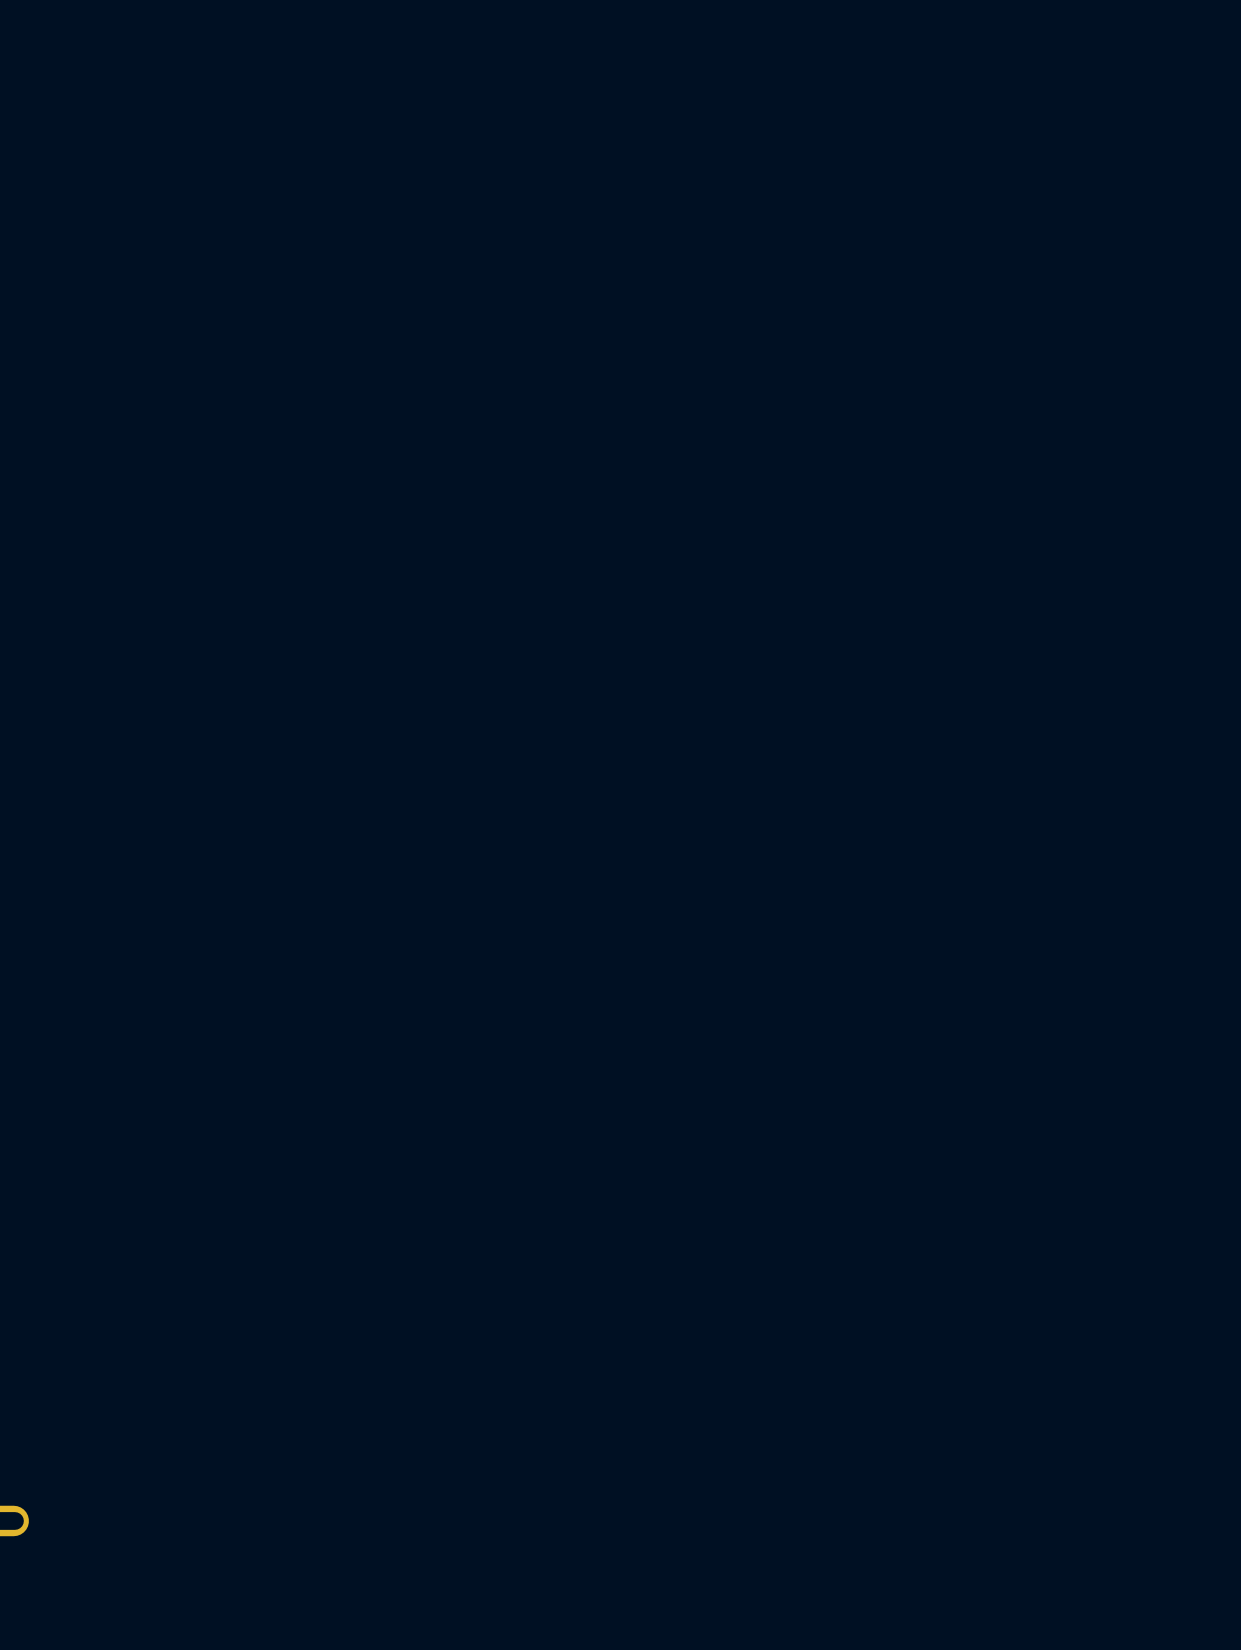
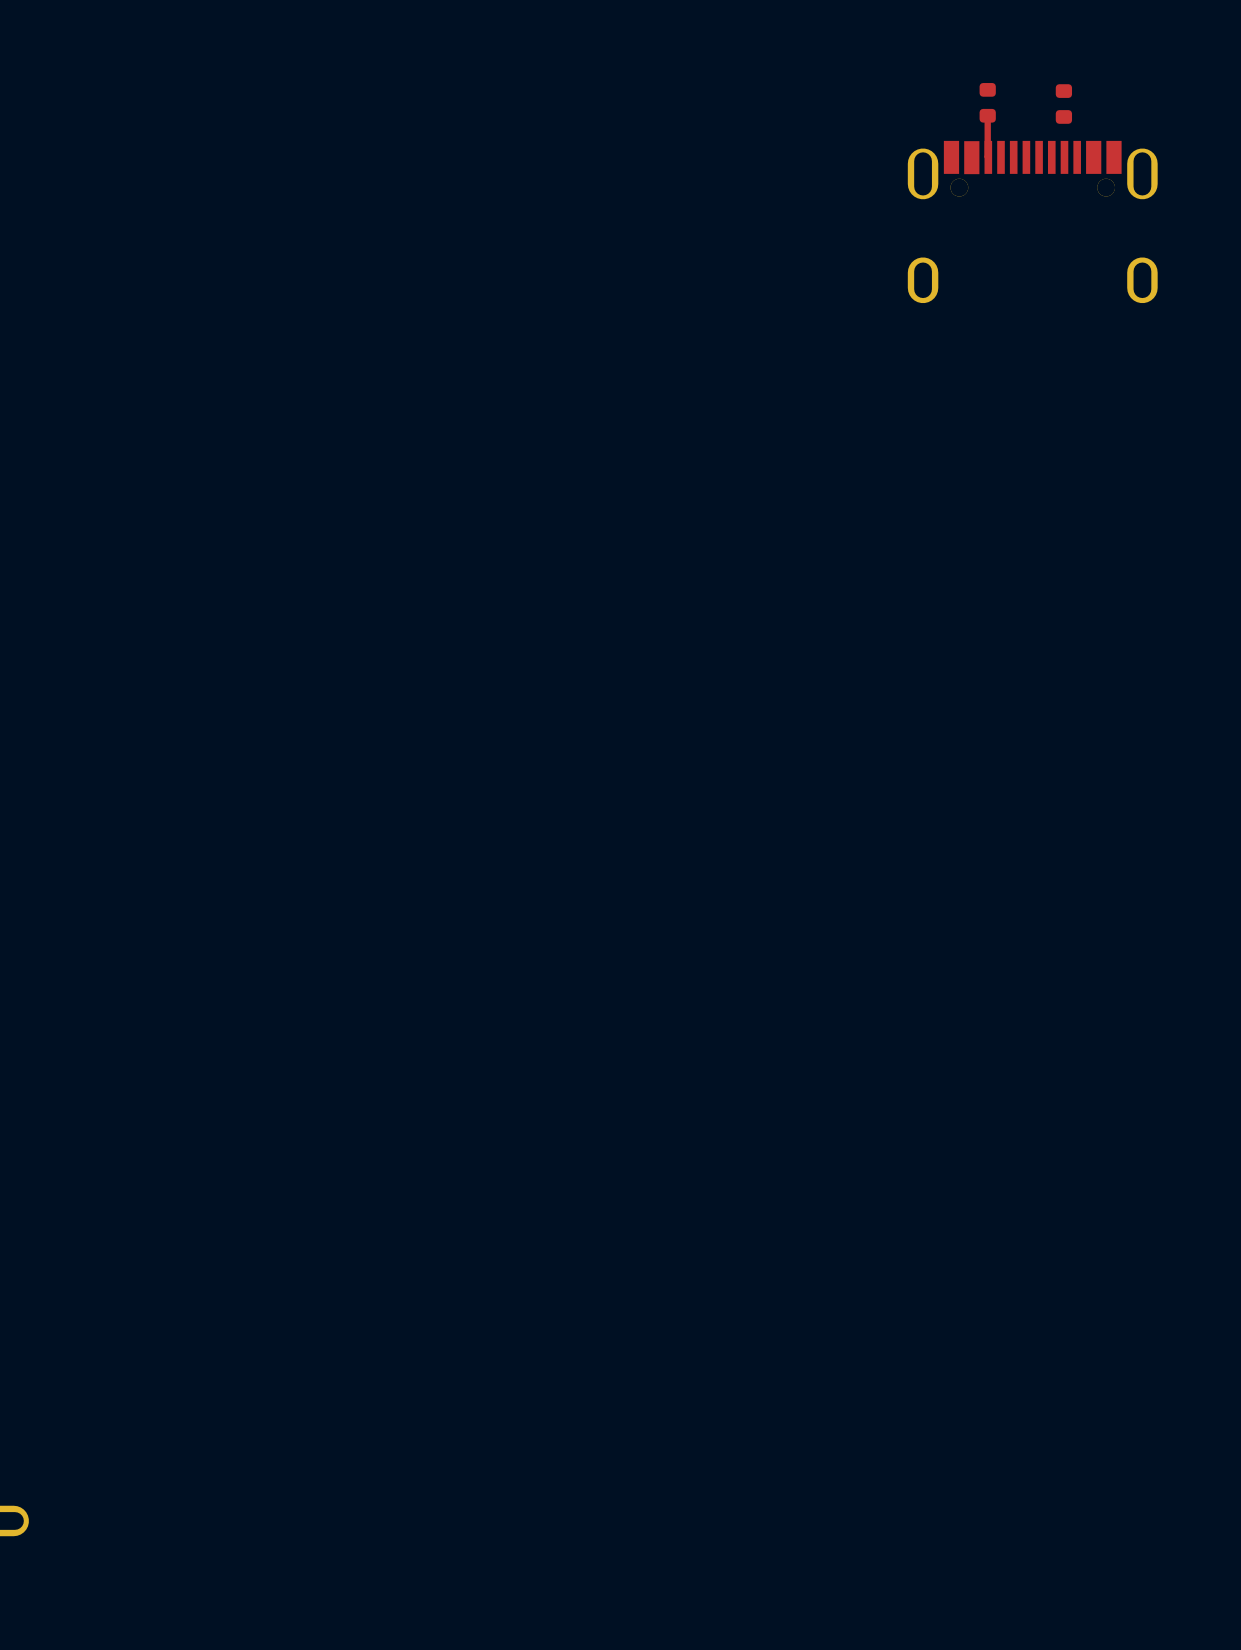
part: none -> (987, 102)
part: none -> (1063, 104)
top track: none -> (987, 115) (988, 157)
part: none -> (1032, 222)

